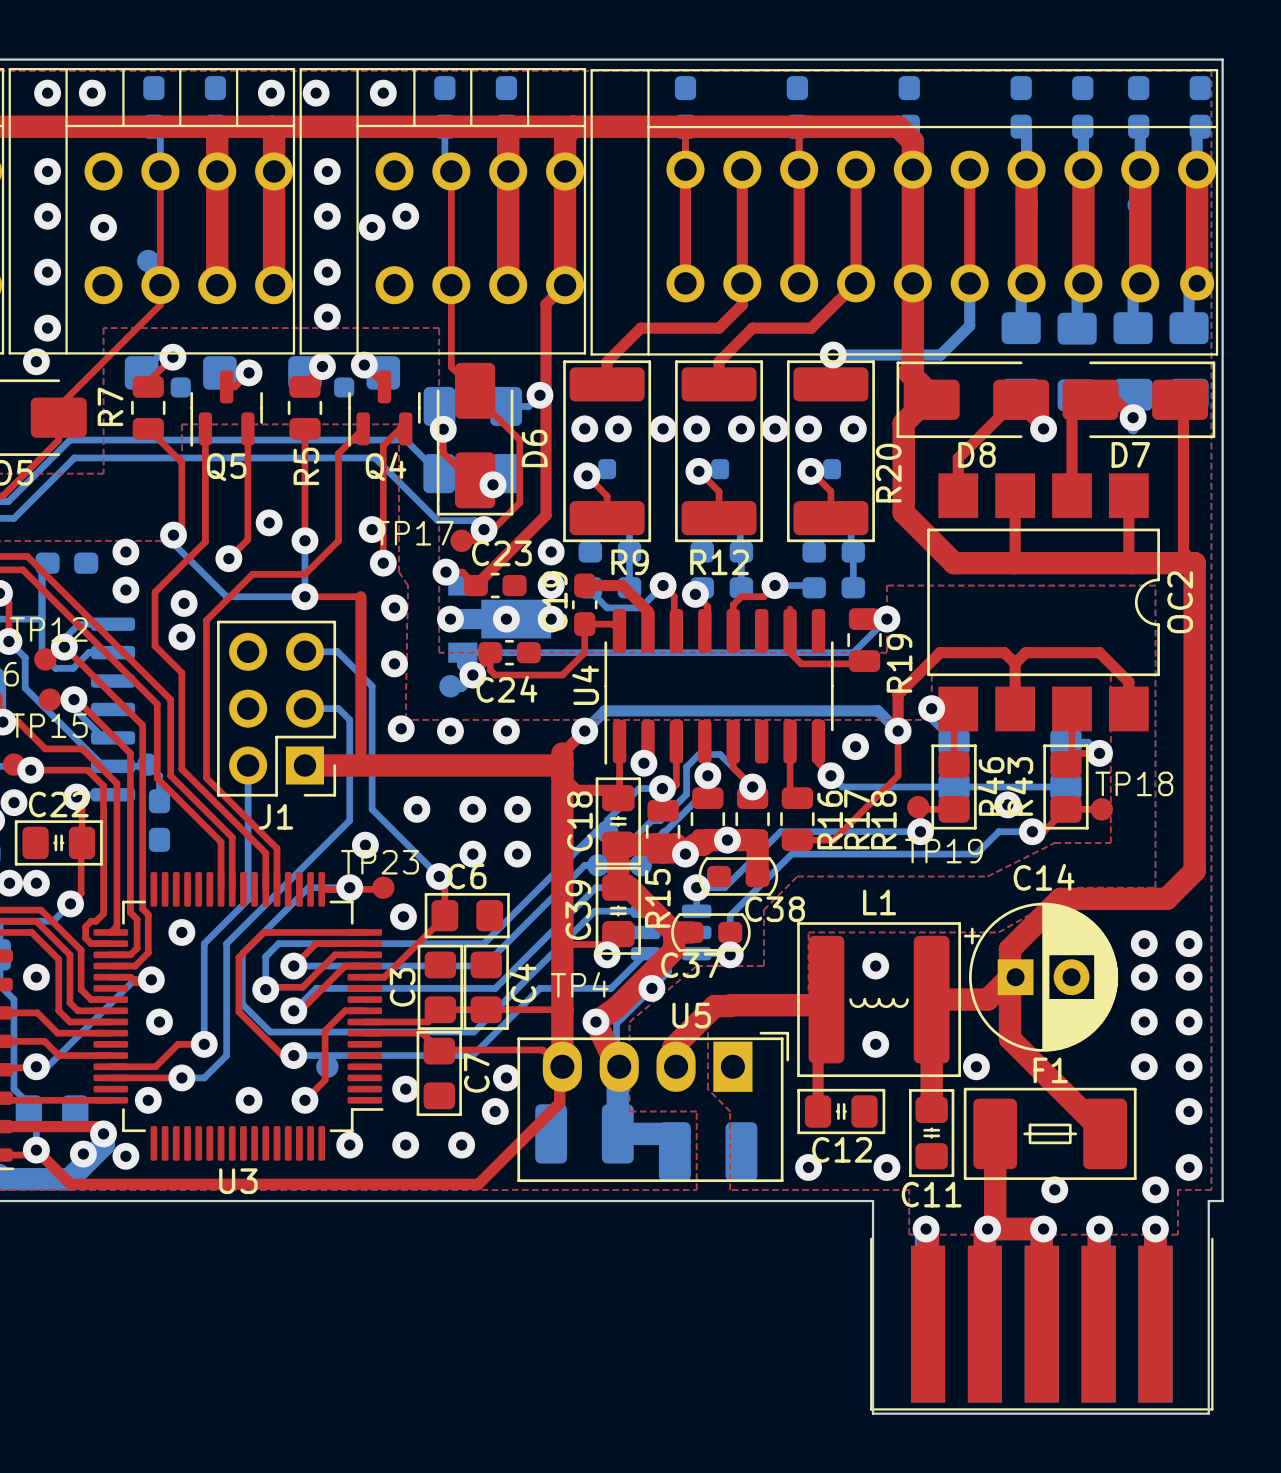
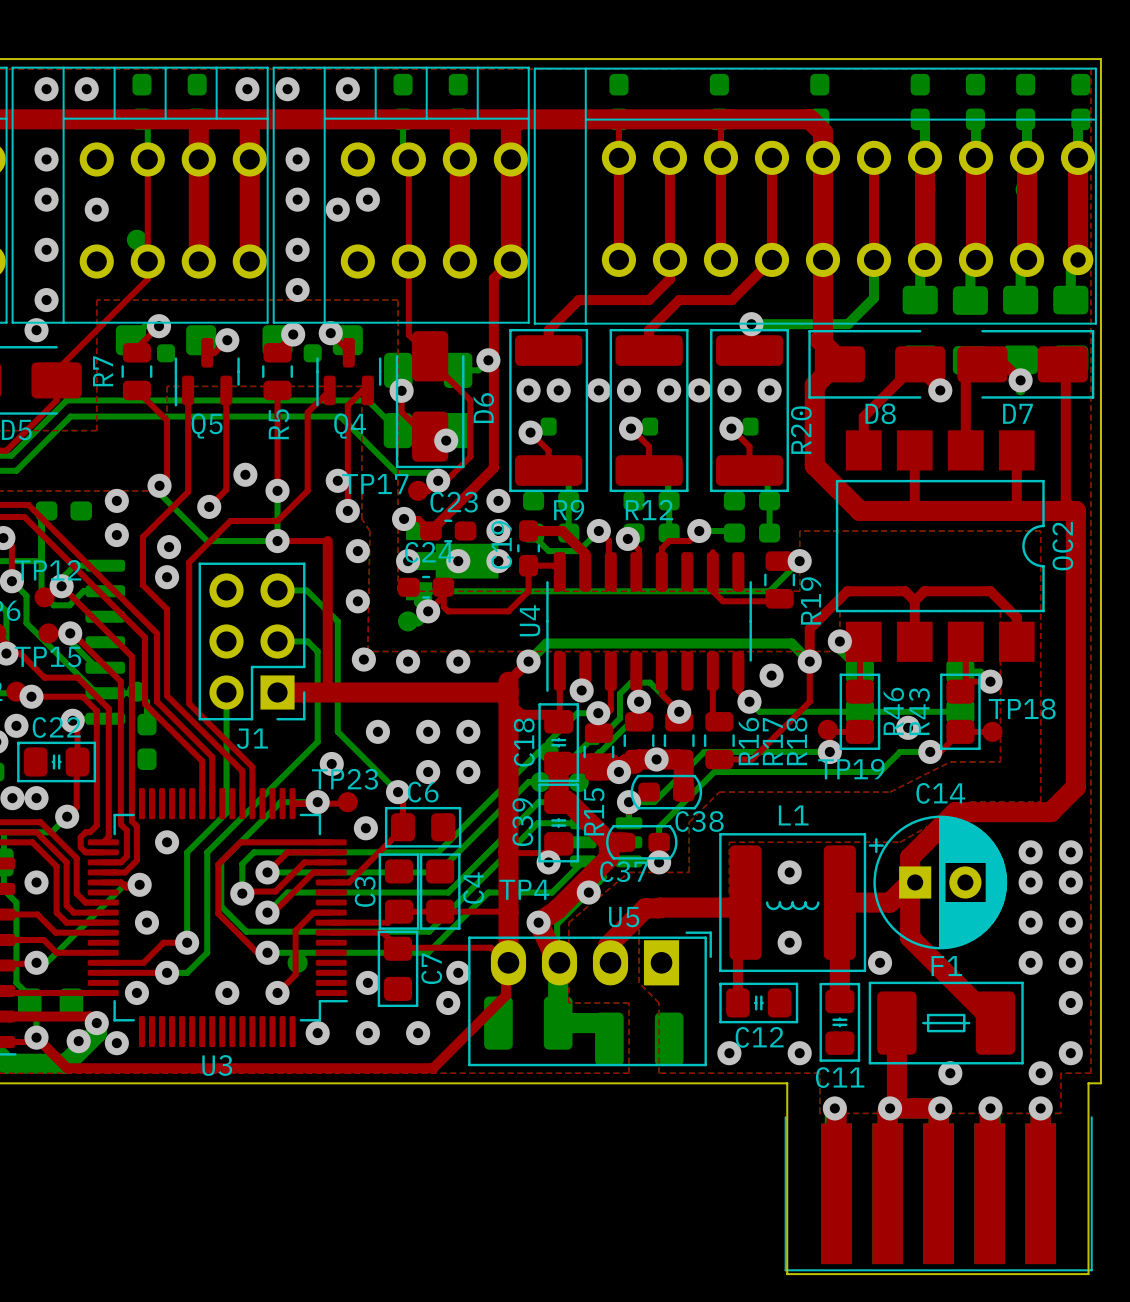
C24 position: (509, 652) -> (426, 587)
C24 name position: C24 (506, 689) -> C24 (429, 552)

